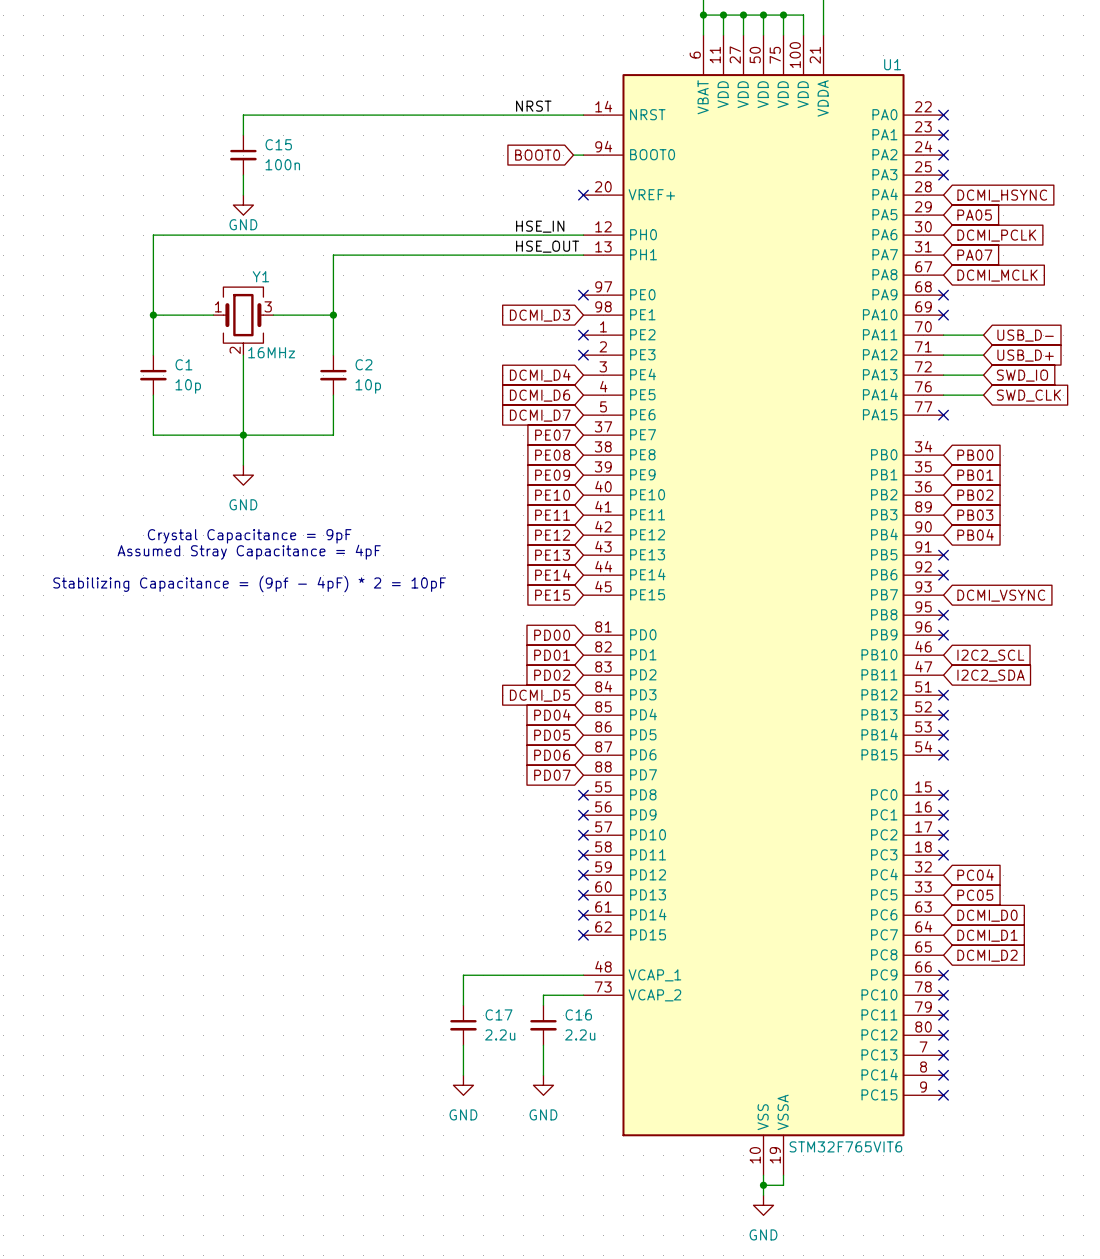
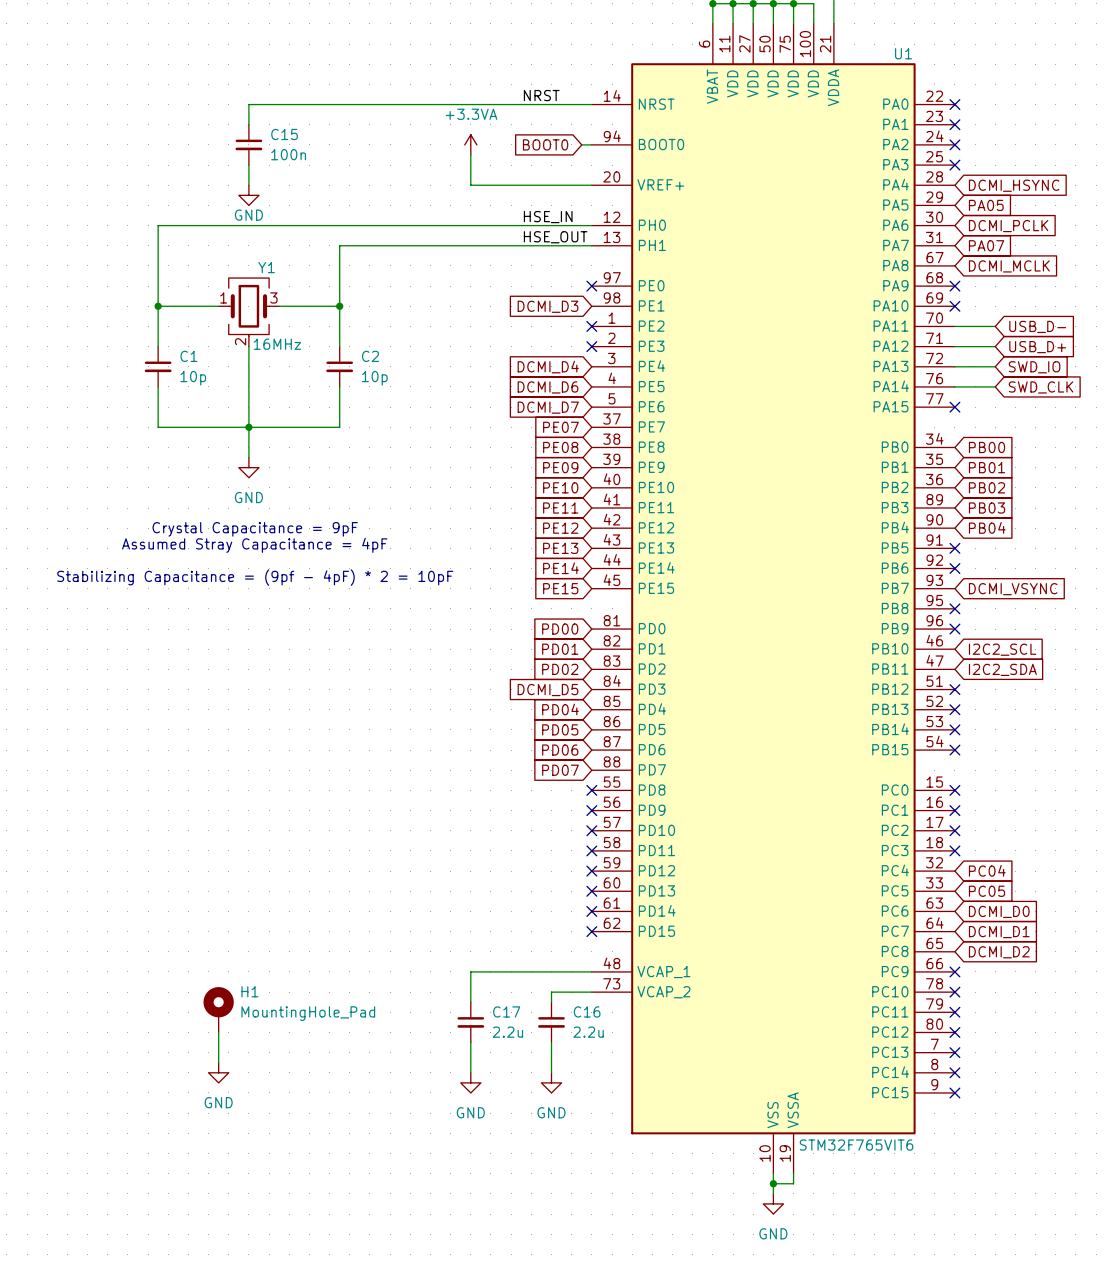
power symbol: none -> +3.3VA (470, 144)
wire: none -> (470, 154) (470, 185) (591, 185)
no-connect mark: (583, 195) -> none
H1: none -> MountingHole_Pad (218, 1009)
wire: none -> (218, 1032) (218, 1062)
power symbol: none -> GND (218, 1072)

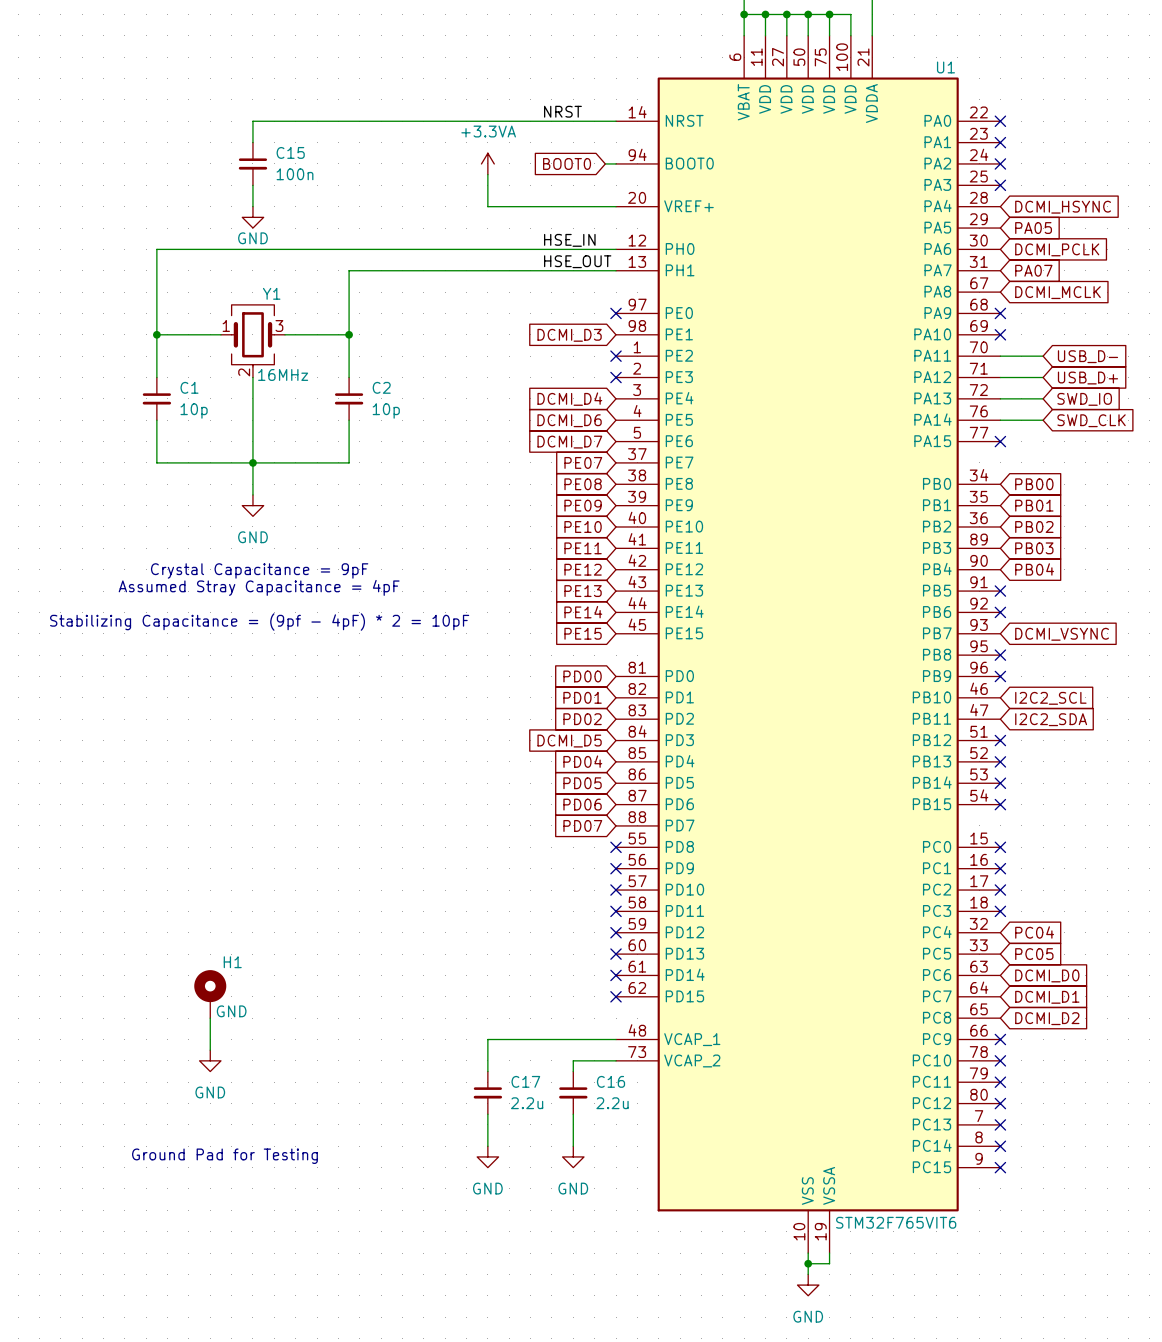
H1 name position: H1 (249, 991) -> H1 (232, 962)
H1 position: (218, 1009) -> (210, 994)
H1 value: MountingHole_Pad (308, 1013) -> GND (231, 1011)
wire: (218, 1032) (218, 1062) -> (210, 1018) (210, 1050)
power symbol position: GND (218, 1072) -> GND (210, 1060)
text: none -> Ground Pad for Testing (224, 1156)

